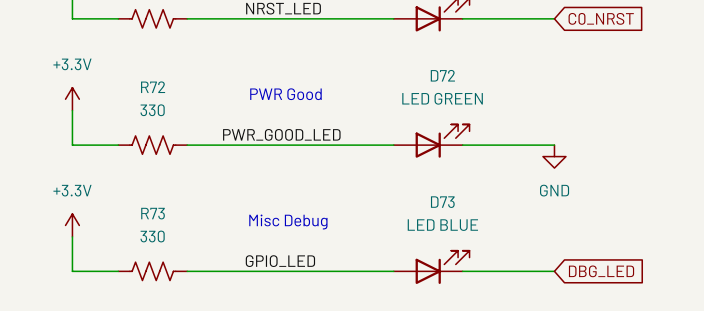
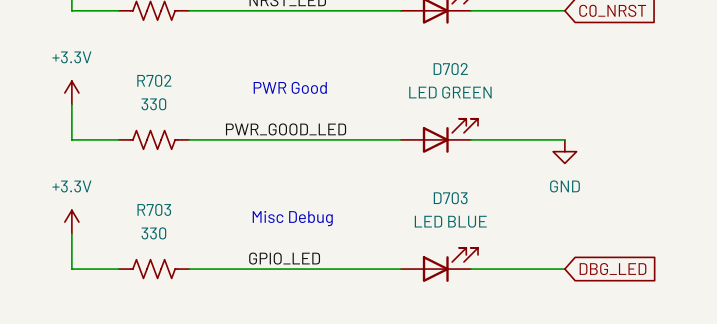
D72 name: D72 (442, 75) -> D702 (450, 69)
R72 name: R72 (153, 87) -> R702 (154, 80)
D73 name: D73 (442, 202) -> D703 (450, 198)
R73 name: R73 (153, 213) -> R703 (154, 209)

